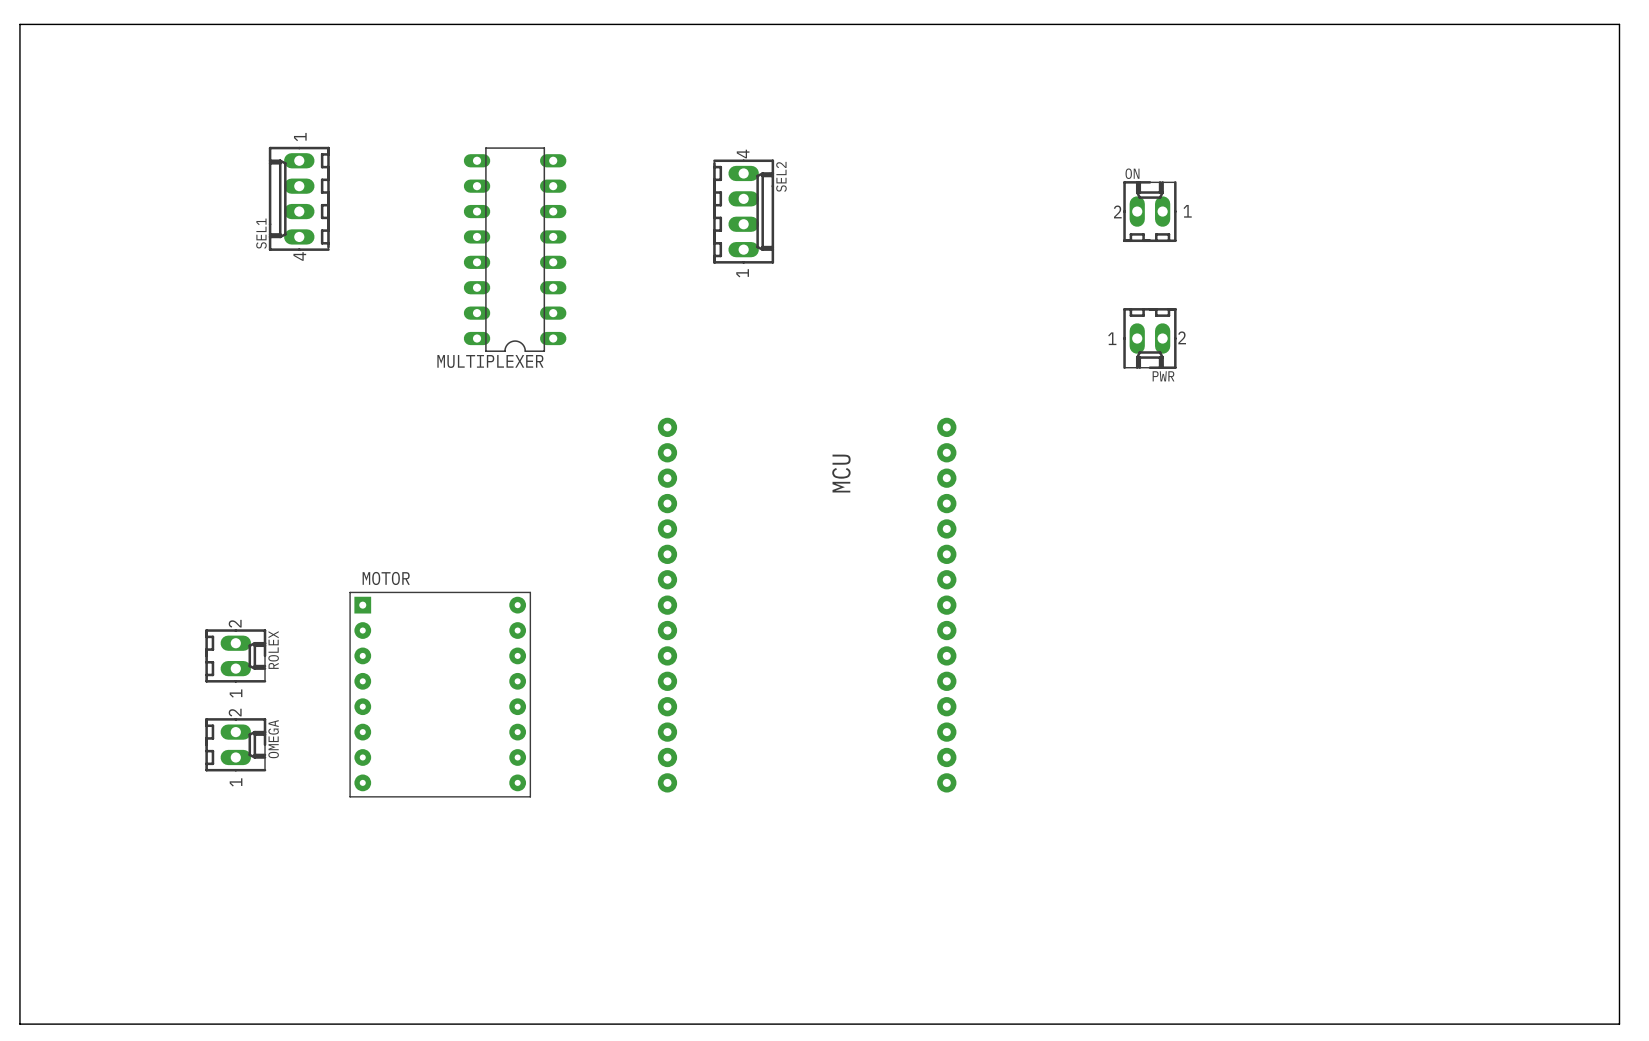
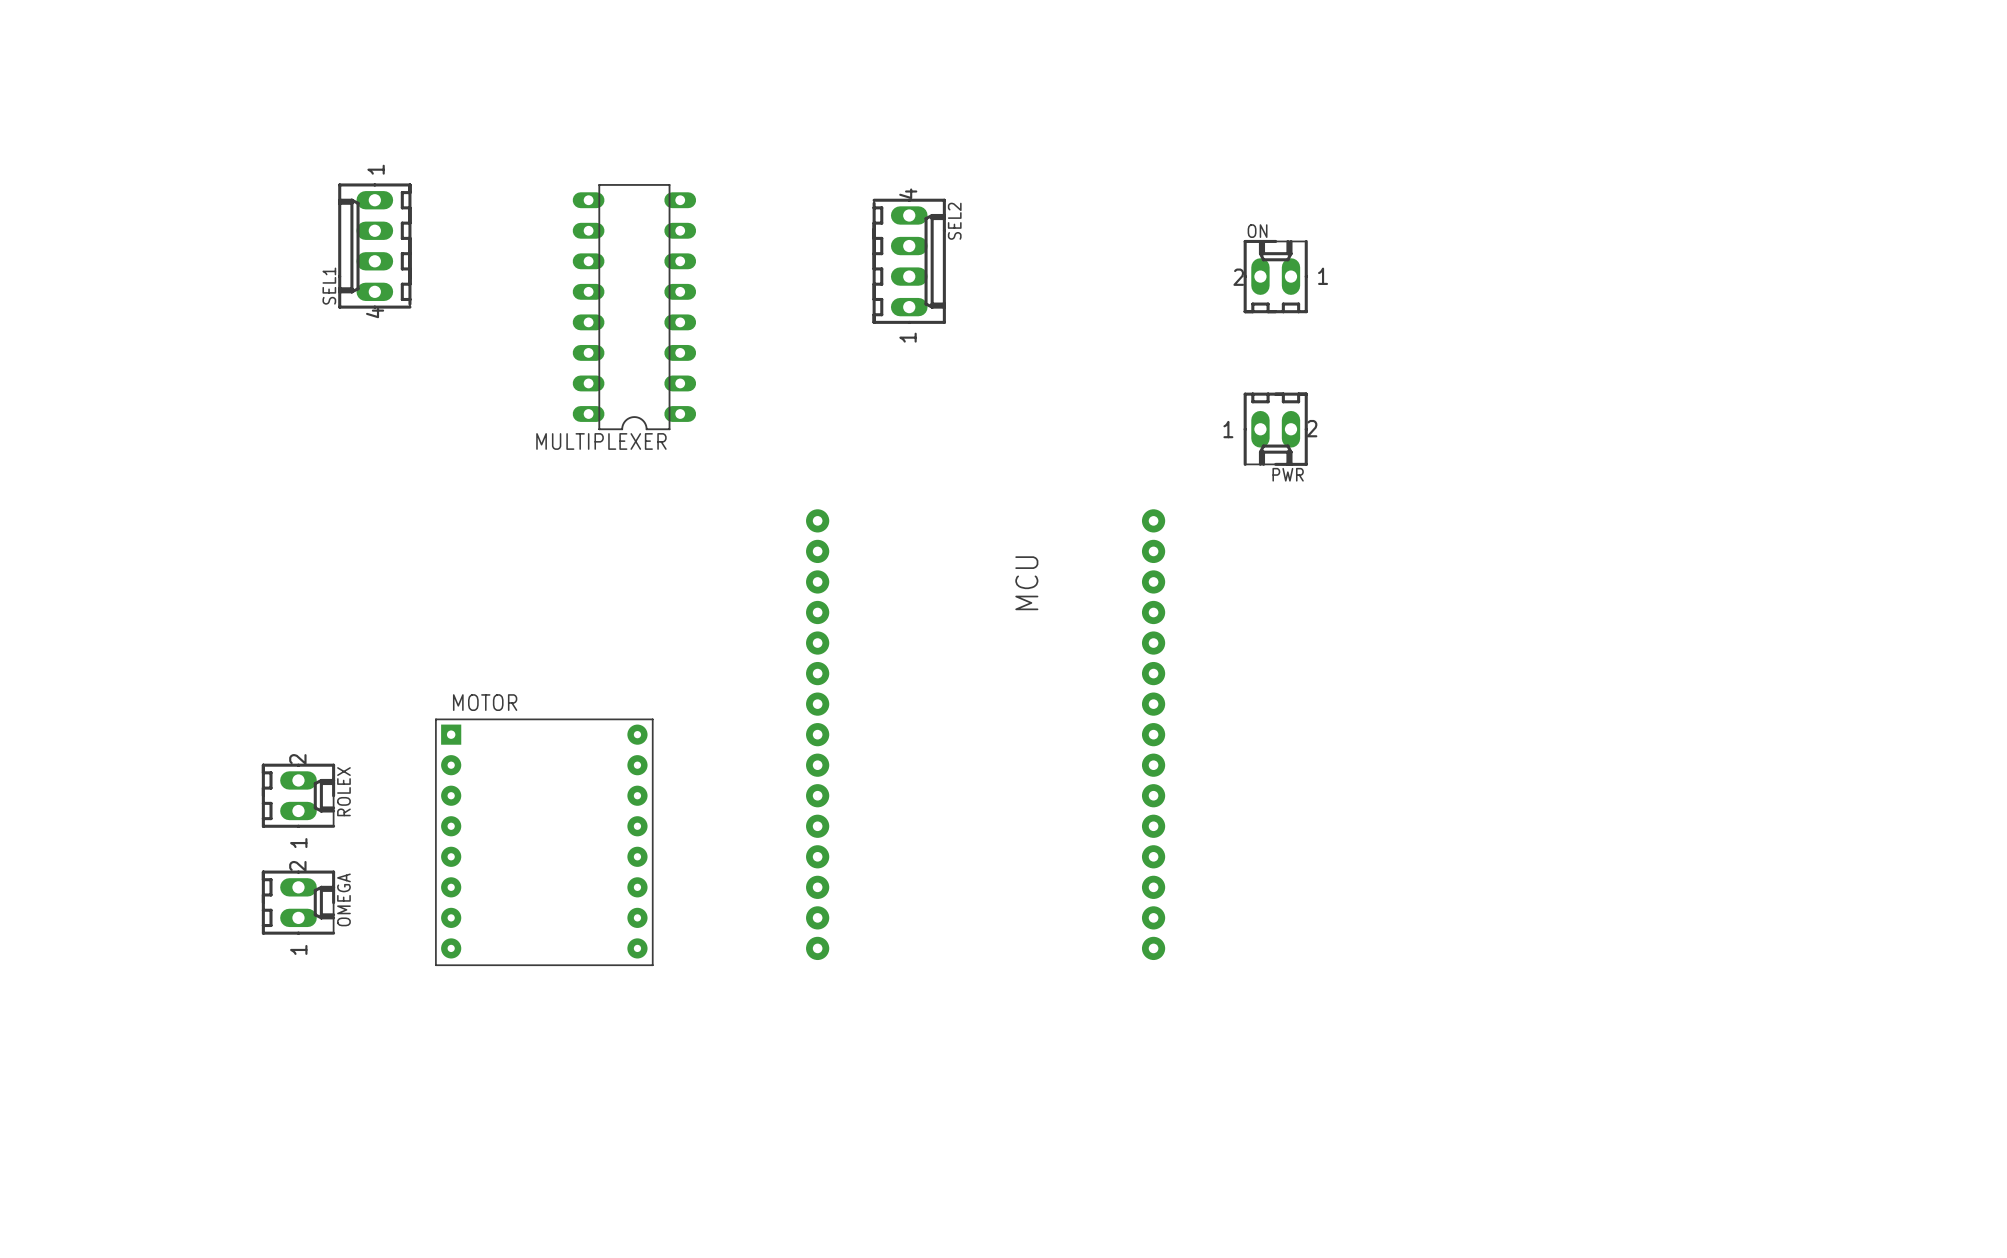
board edge: (19, 24) (1619, 24) (1619, 1024) (19, 1024) (19, 24) -> none
ON position: (1149, 211) -> (1275, 276)
PWR position: (1149, 338) -> (1275, 429)

